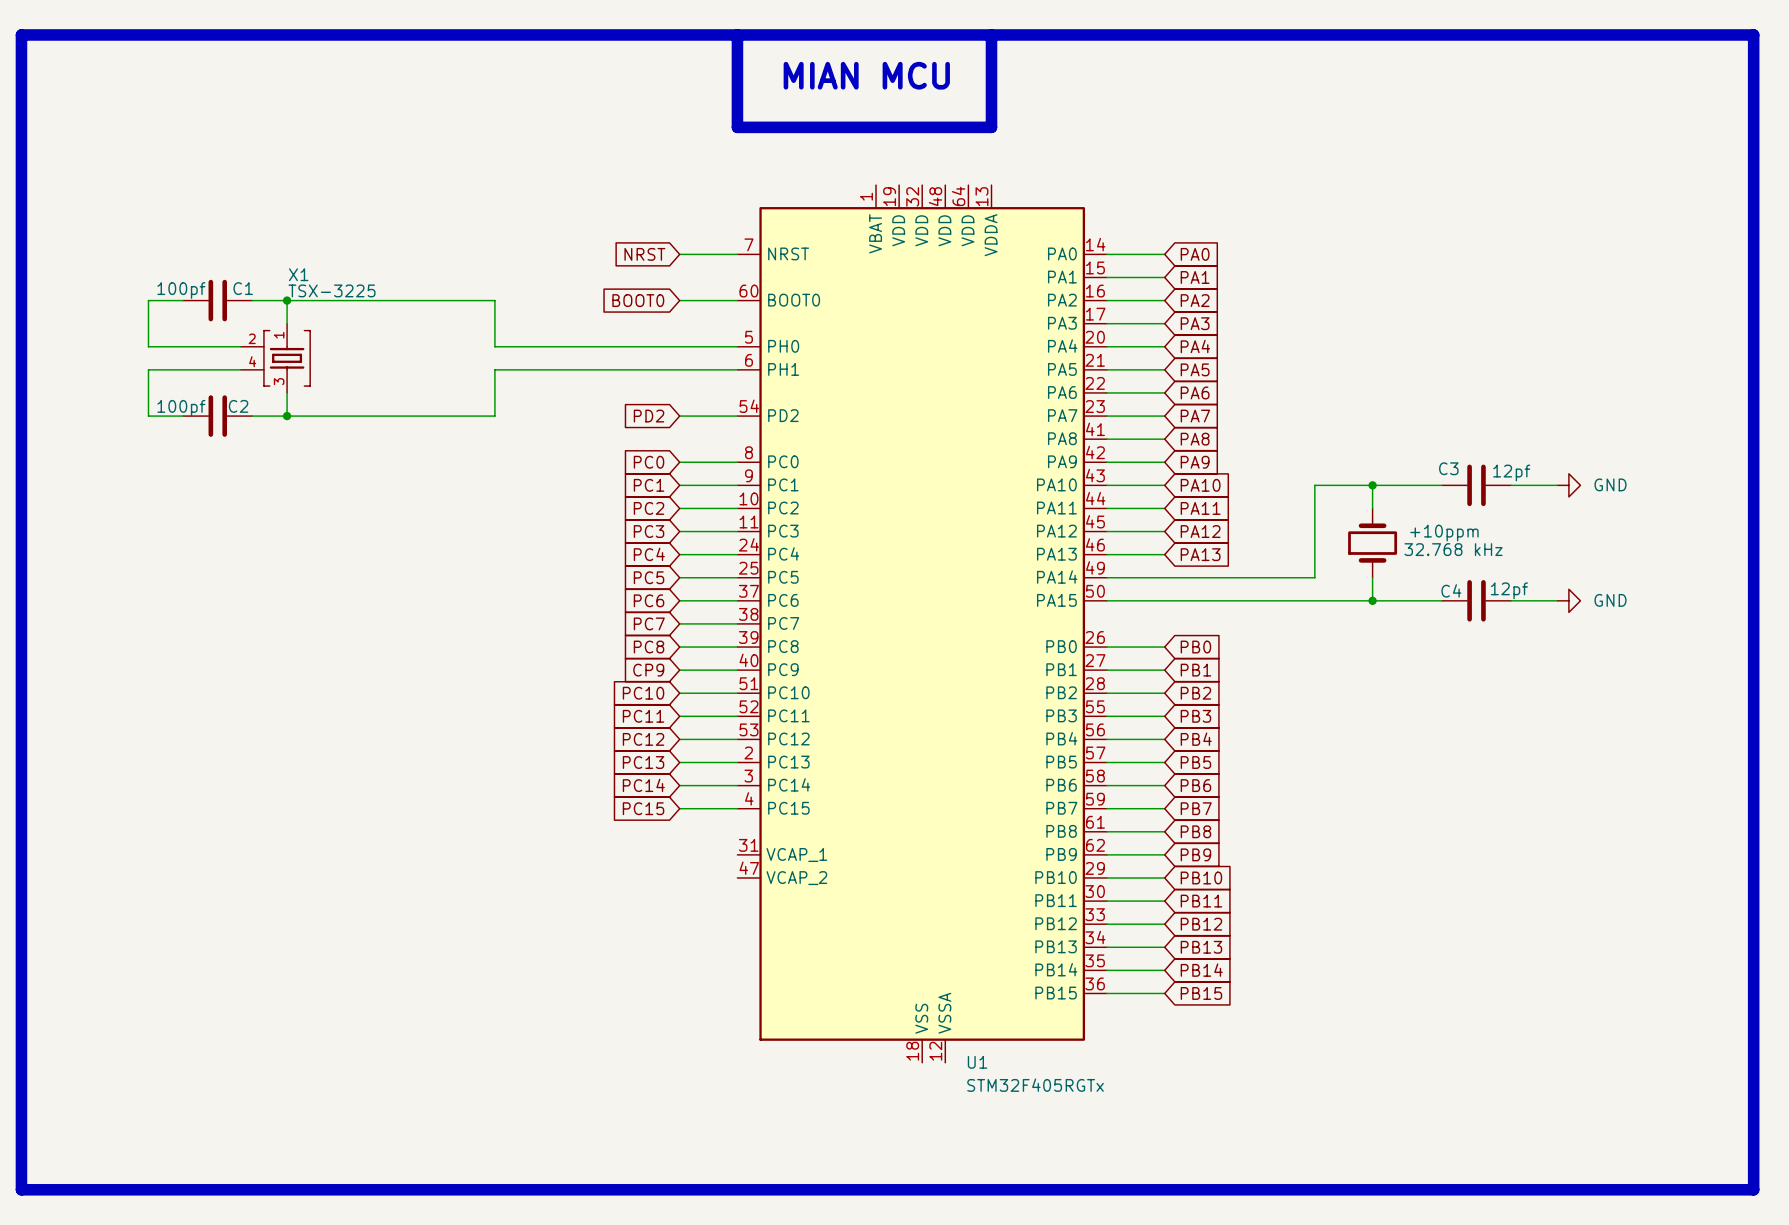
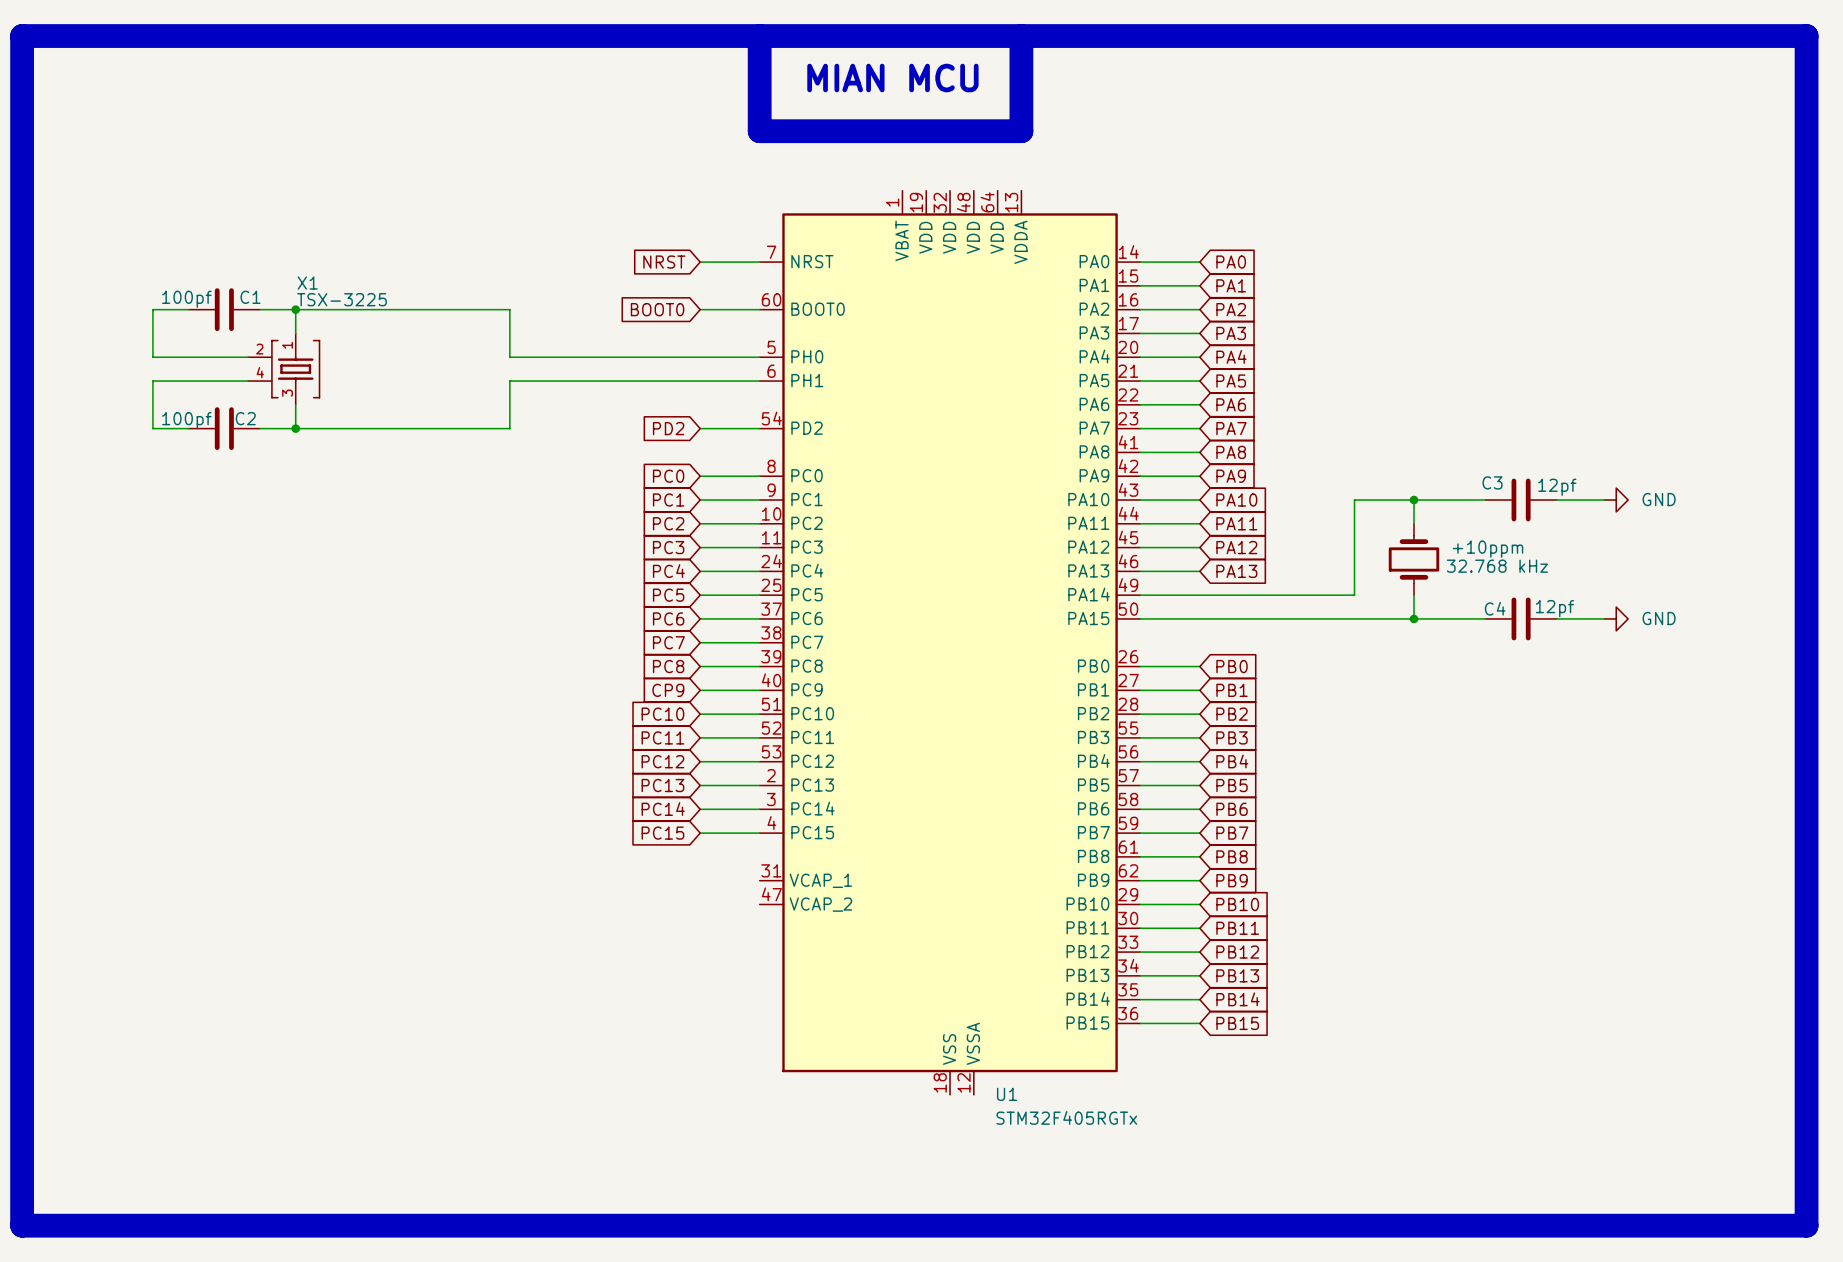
line width: thin (21, 34) (21, 1189) (1753, 1189) (1753, 34) (21, 34) -> thick (22, 36) (22, 1225) (1806, 1225) (1806, 36) (22, 36)
line width: thin (737, 34) (737, 127) (991, 127) (991, 34) -> thick (759, 36) (759, 131) (1021, 131) (1021, 36)

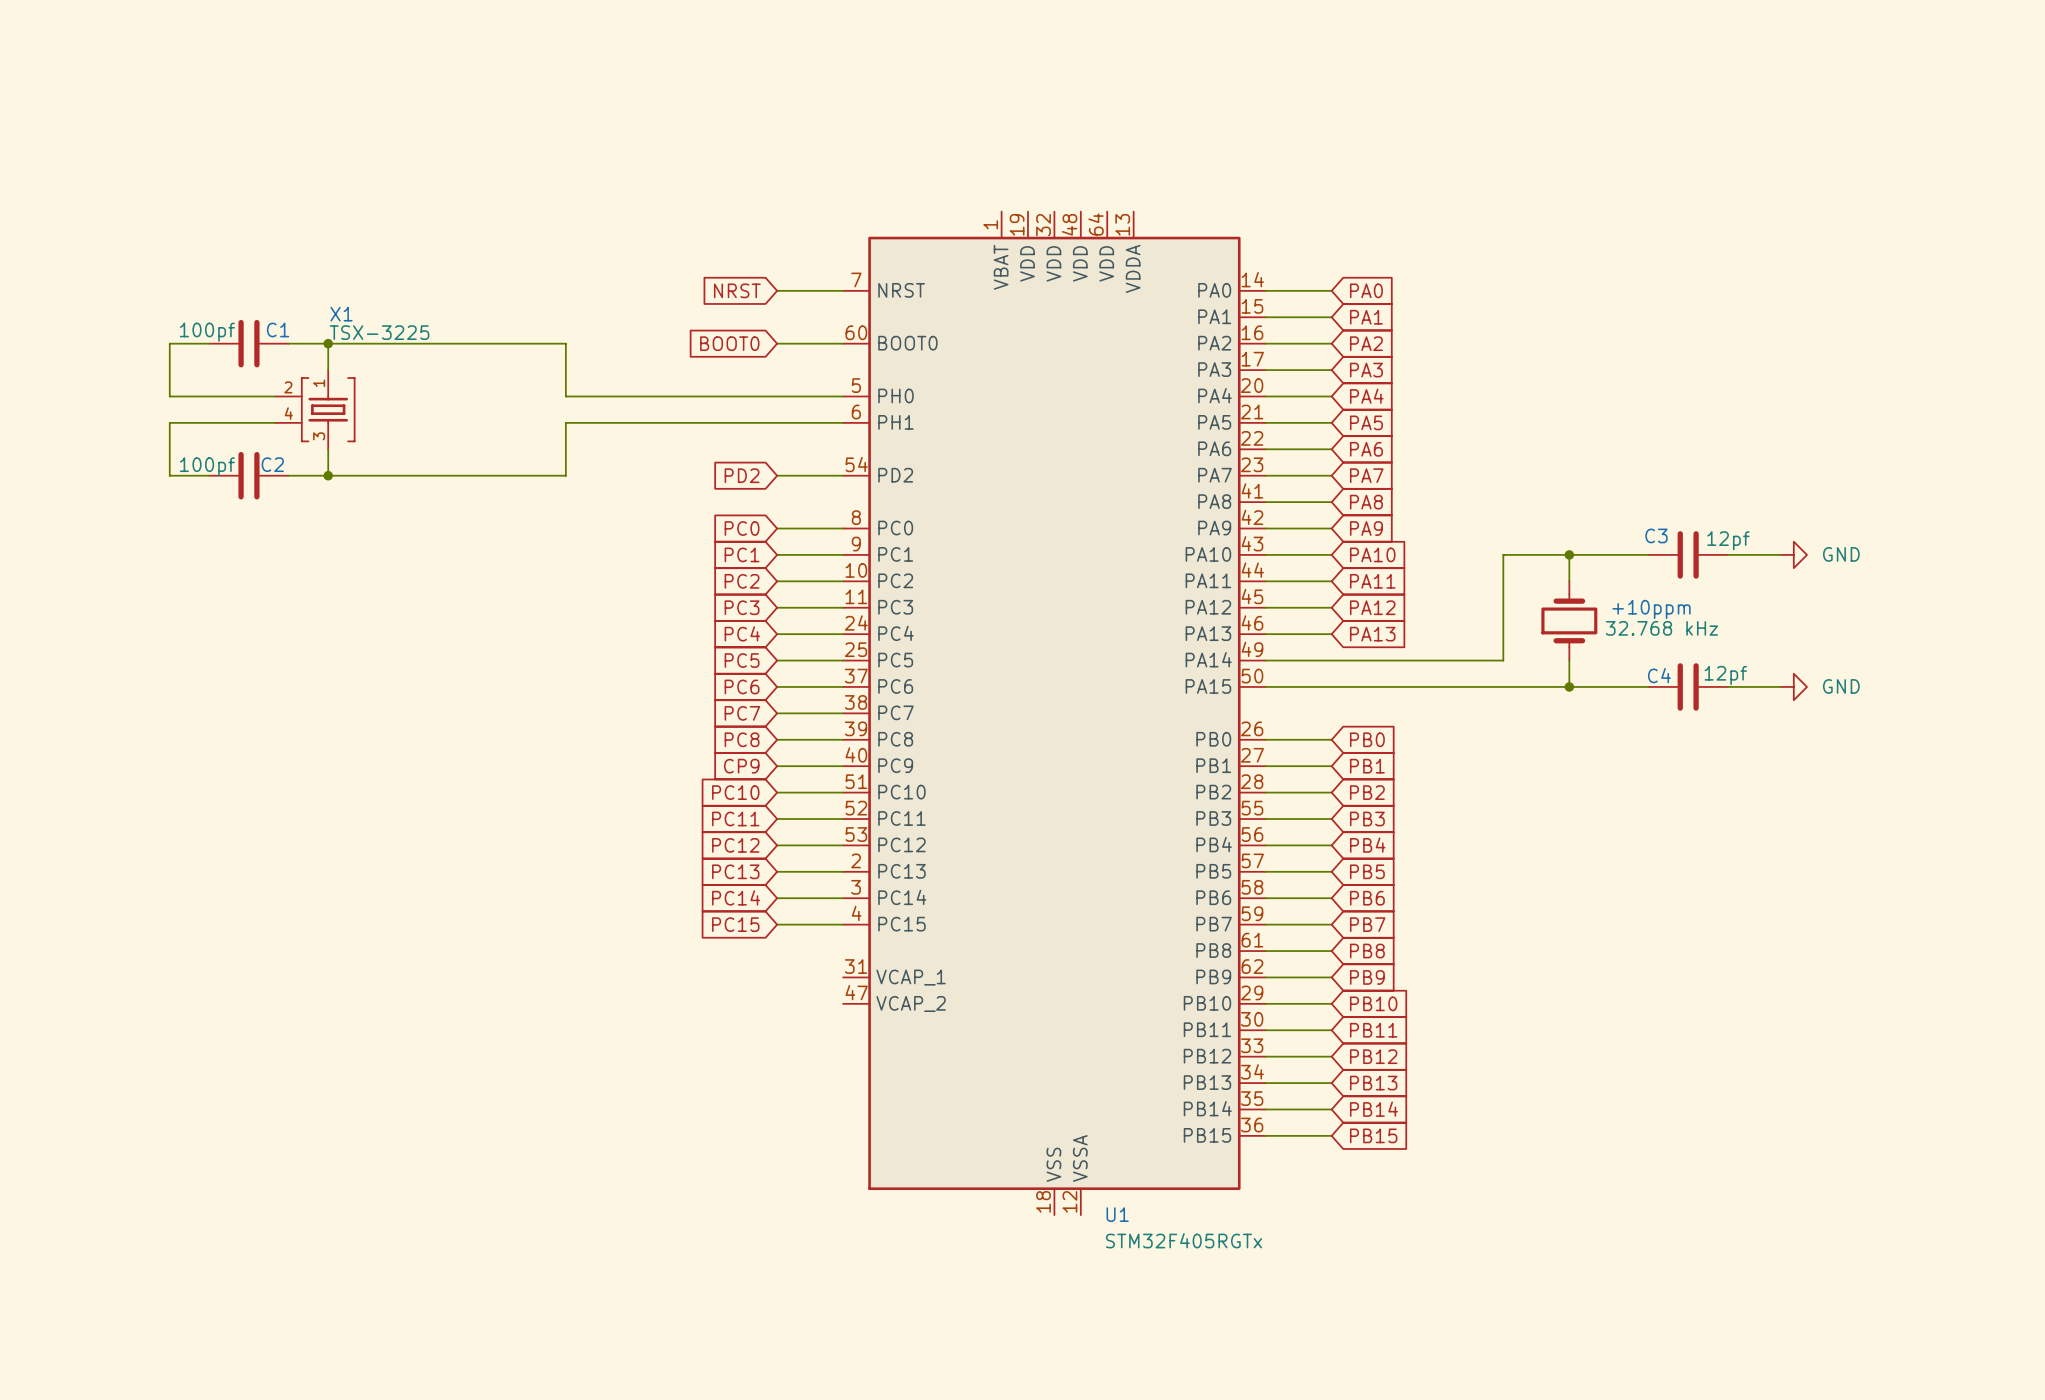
line: (22, 36) (22, 1225) (1806, 1225) (1806, 36) (22, 36) -> none
line: (759, 36) (759, 131) (1021, 131) (1021, 36) -> none
text: MIAN MCU (892, 78) -> none

